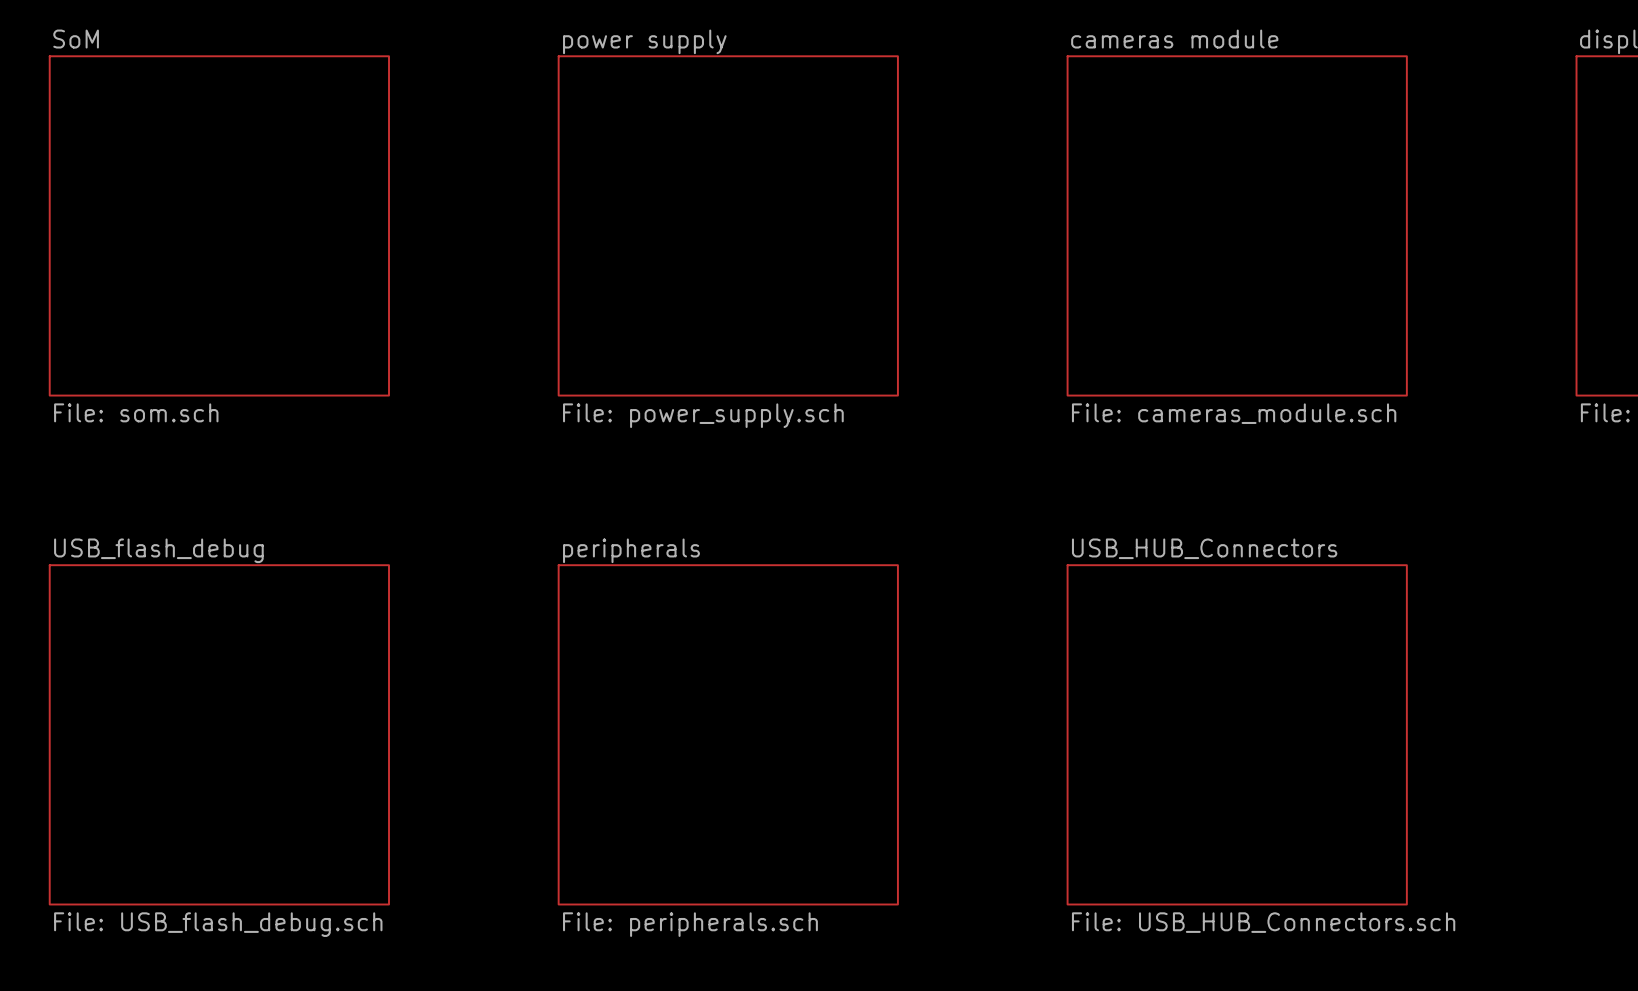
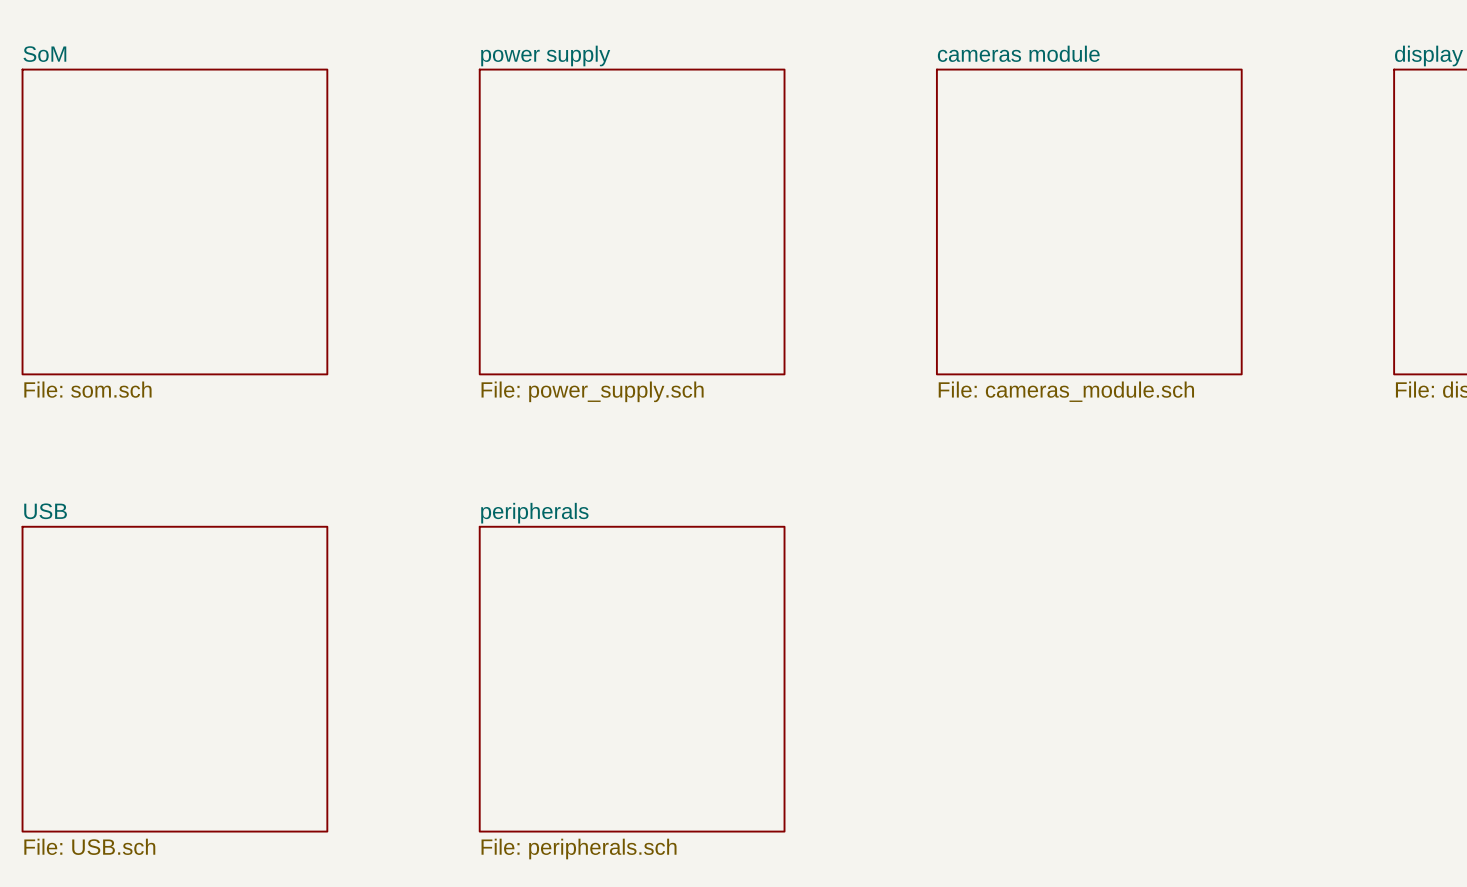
sheet USB_flash_debug name: USB_flash_debug (158, 550) -> USB (45, 511)
sheet USB_HUB_Connectors: File: USB_HUB_Connectors.sch (1237, 734) -> none
sheet USB_flash_debug value: File: USB_flash_debug.sch (218, 924) -> File: USB.sch (89, 846)

